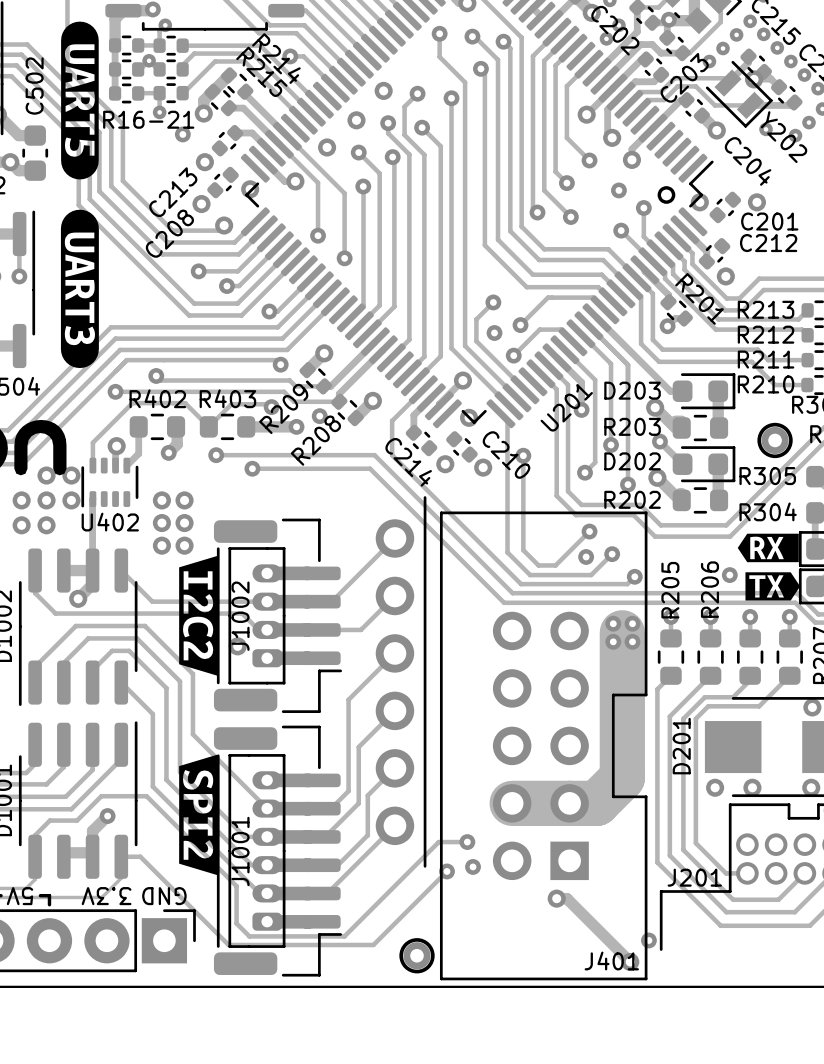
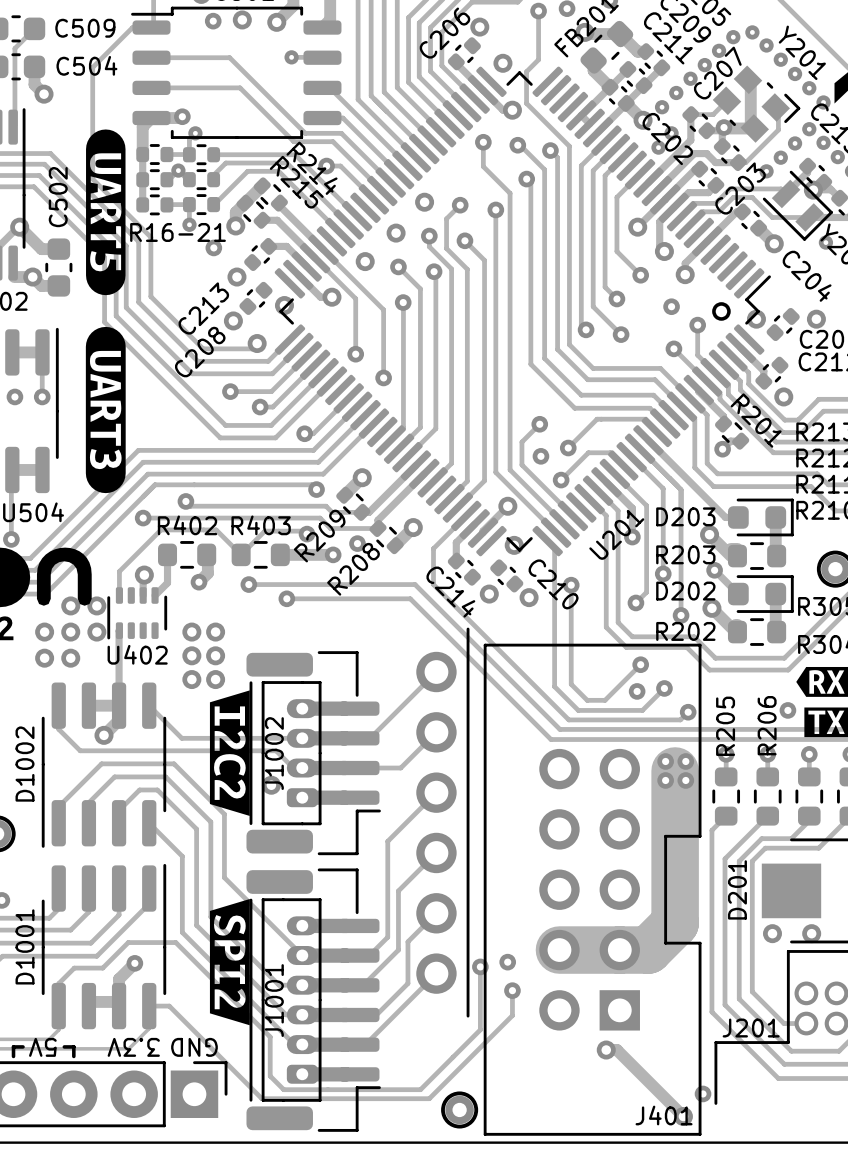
via: none -> (507, 962)
track: none -> (480, 966) (480, 1029) (420, 1089) (383, 1089)
via: none -> (480, 966)
track: (467, 842) (438, 842) (344, 936) -> (512, 990) (512, 1015) (429, 1098) (413, 1098)
via: (473, 866) -> none
track: (446, 871) (373, 945) -> none
via: (446, 871) -> none

